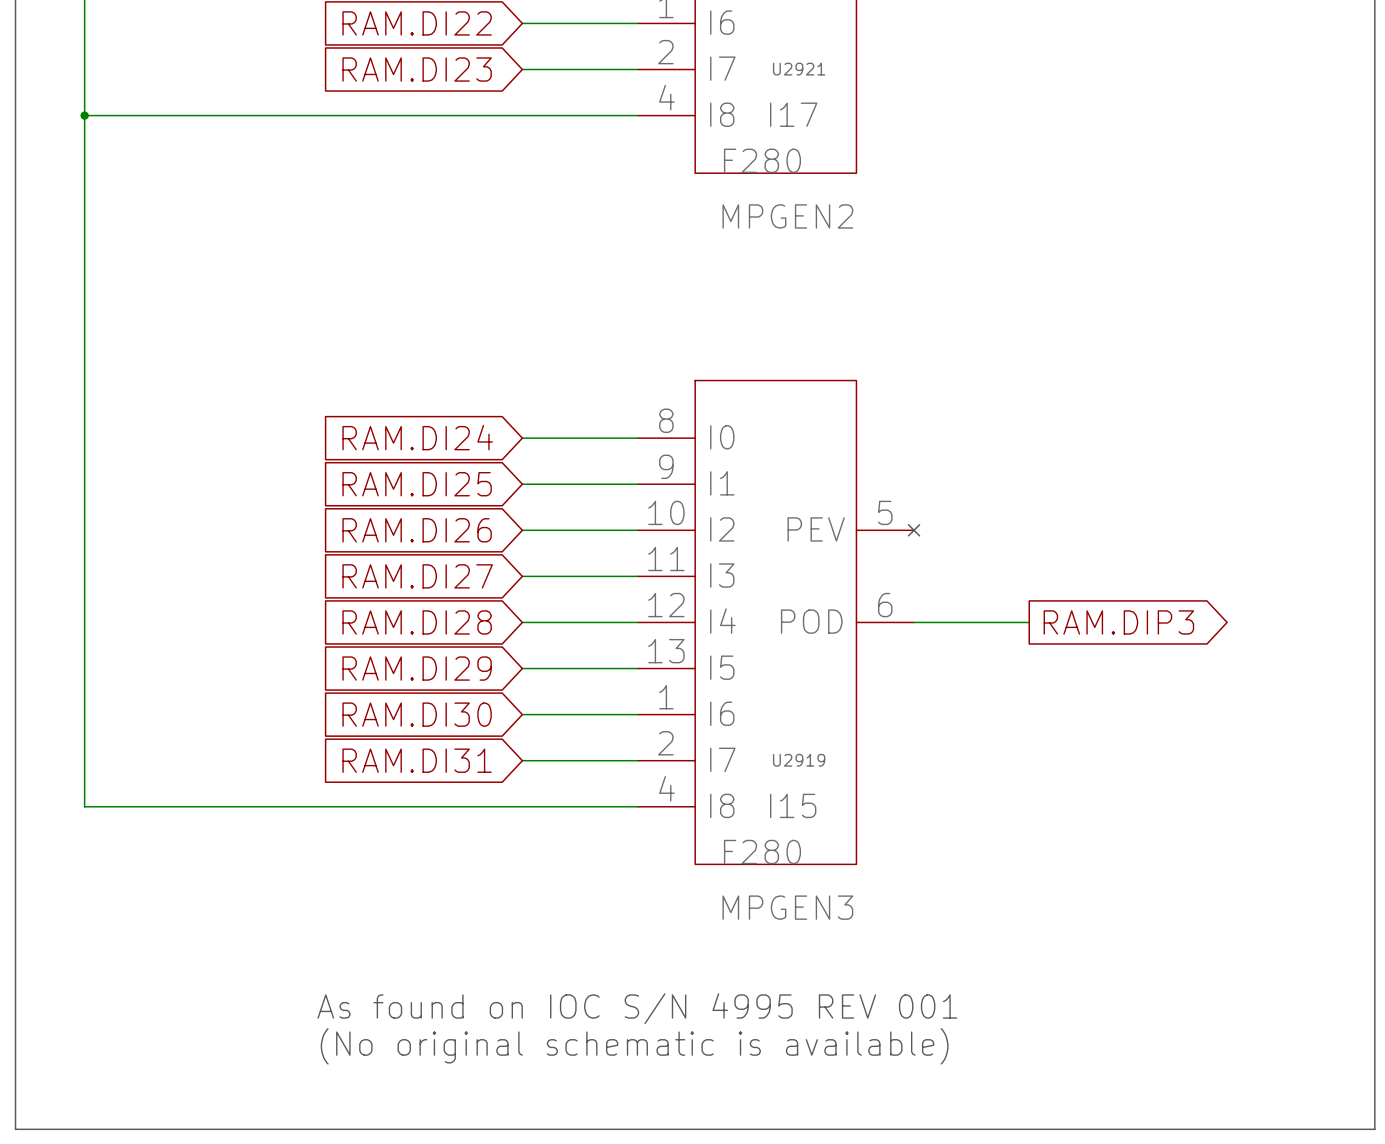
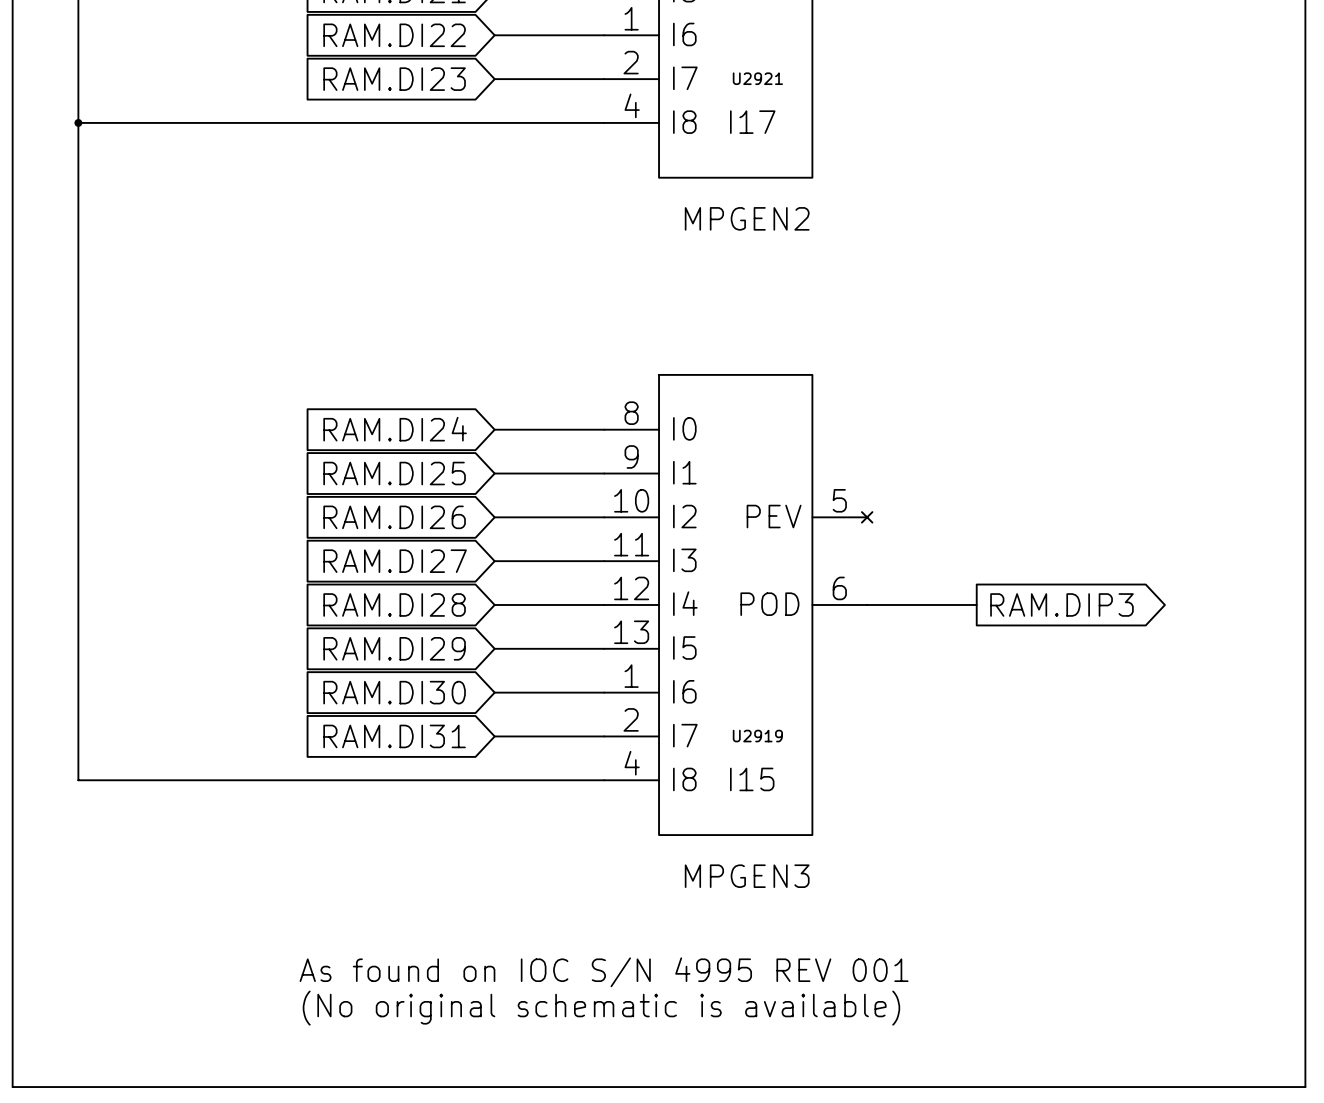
U2921 value: F280 (762, 160) -> none
U2919 value: F280 (762, 851) -> none

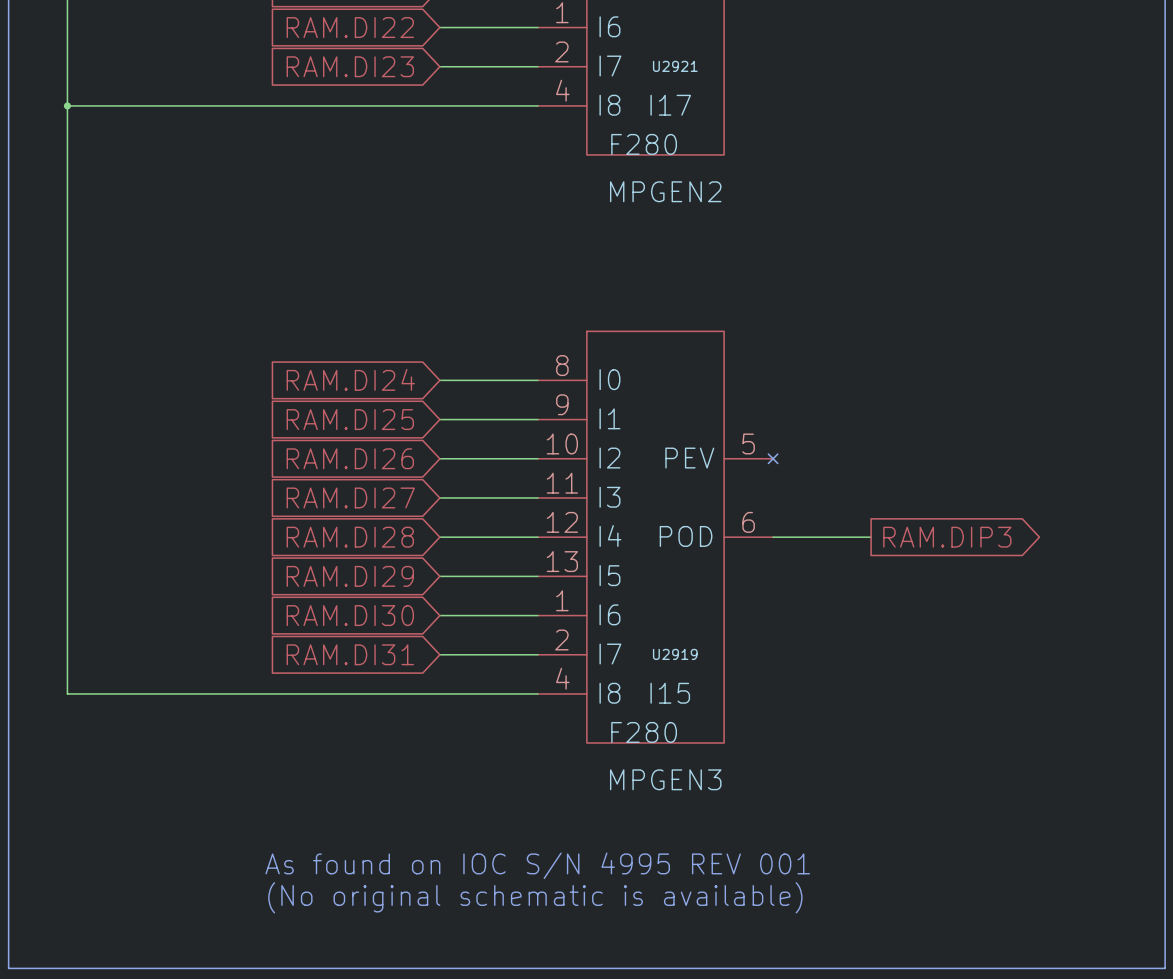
U2921 value: none -> F280 (644, 144)
U2919 value: none -> F280 (644, 732)

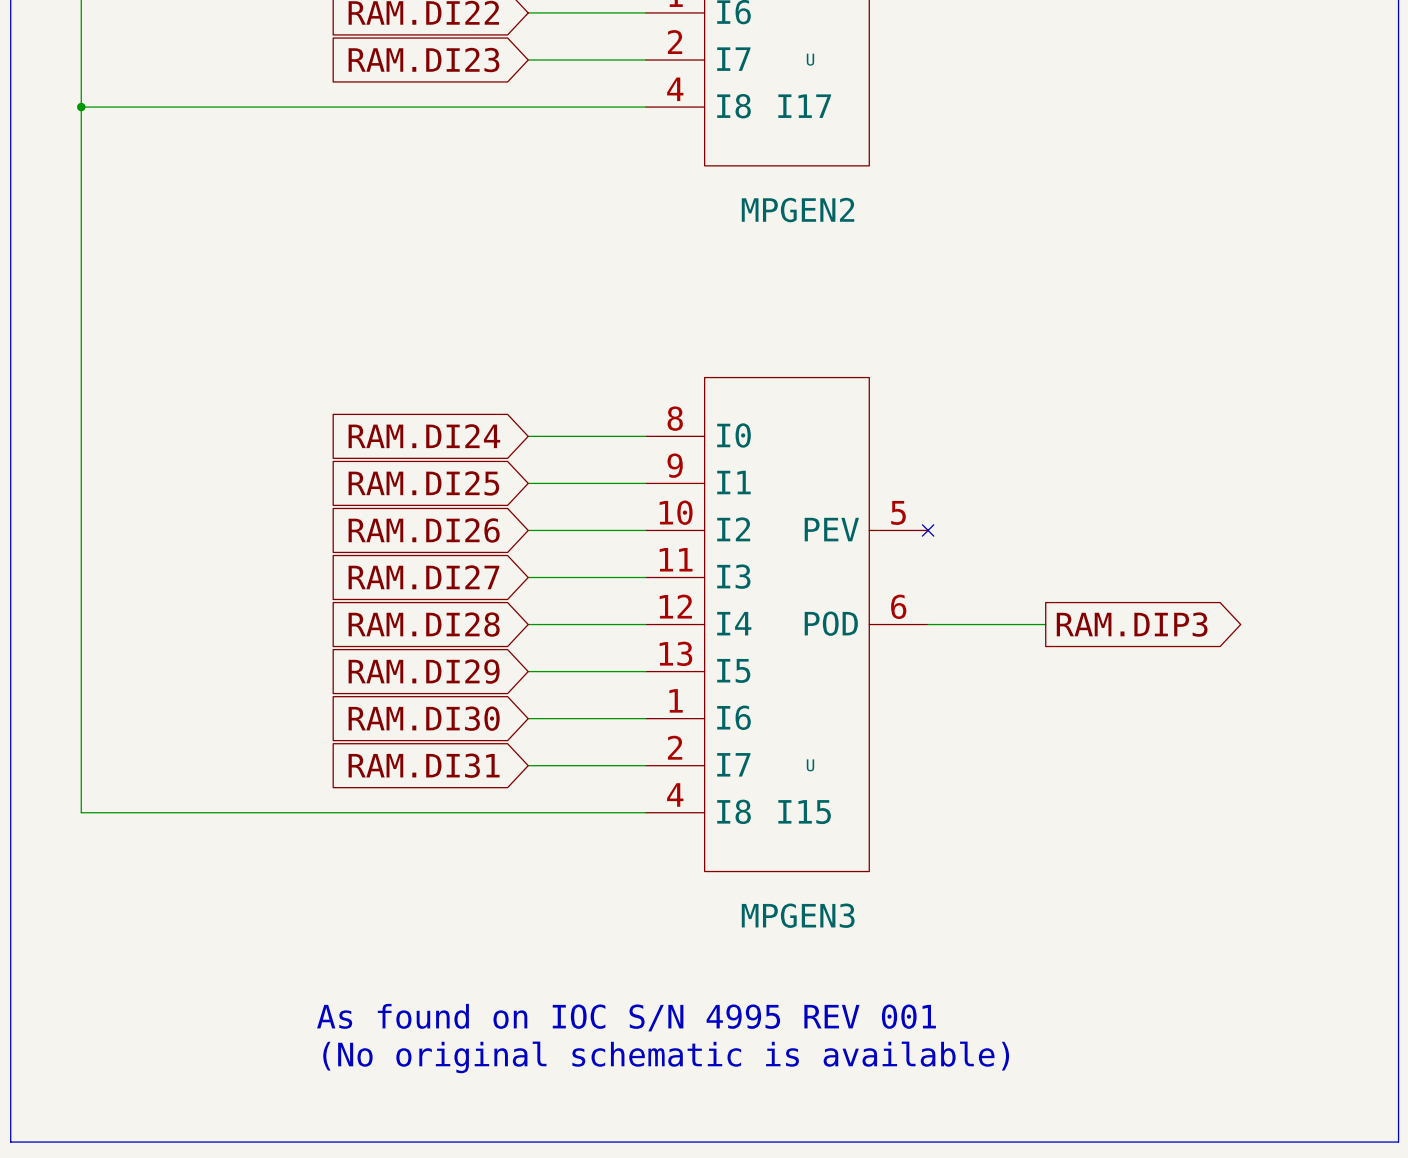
U2921 name: U2921 (675, 66) -> U (810, 59)
U2921 value: F280 (644, 144) -> none
U2919 name: U2919 (675, 654) -> U (810, 765)
U2919 value: F280 (644, 732) -> none

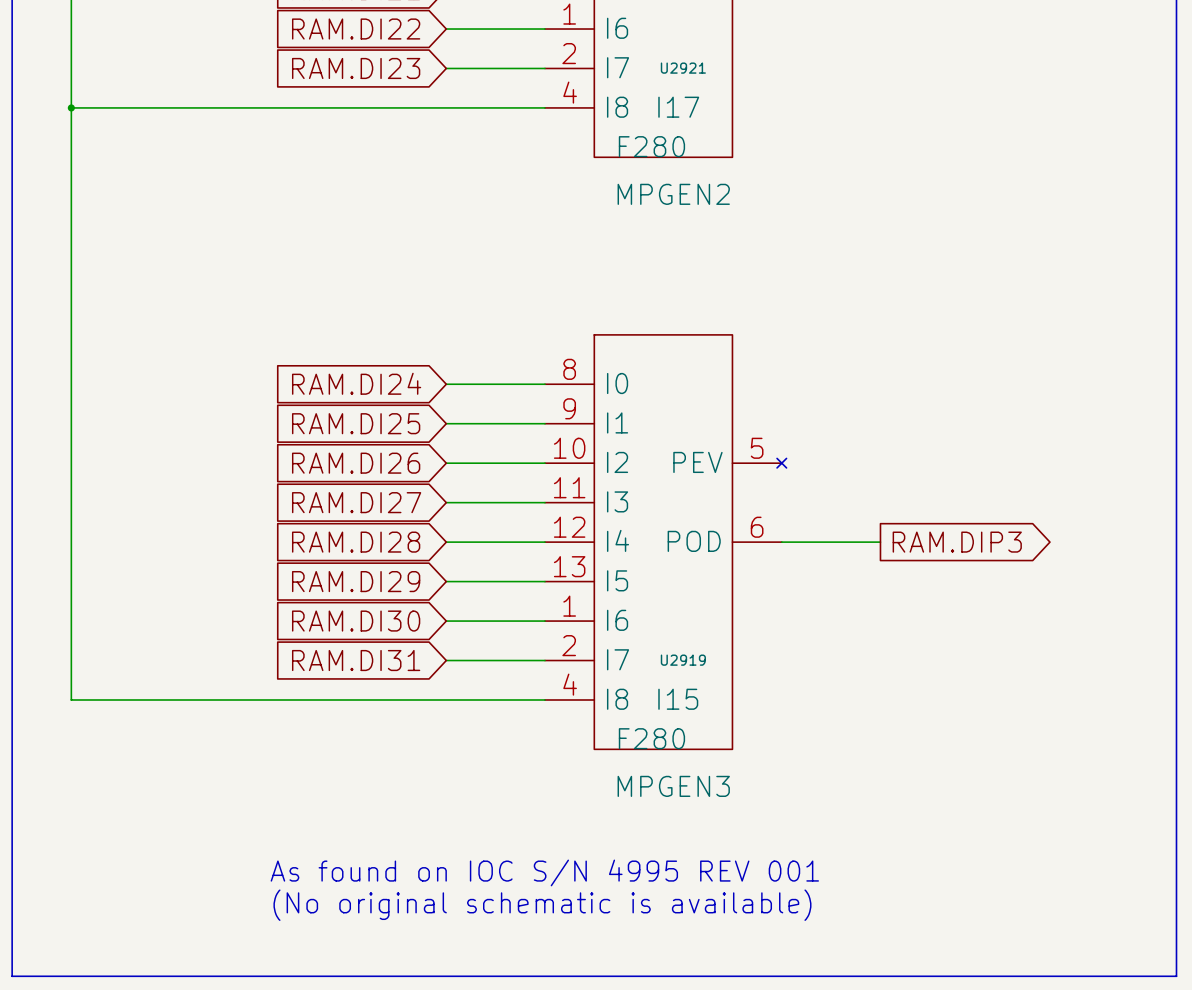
U name: U (810, 59) -> U2921 (683, 68)
U value: none -> F280 (651, 146)
U name: U (810, 765) -> U2919 (683, 660)
U value: none -> F280 (651, 738)

